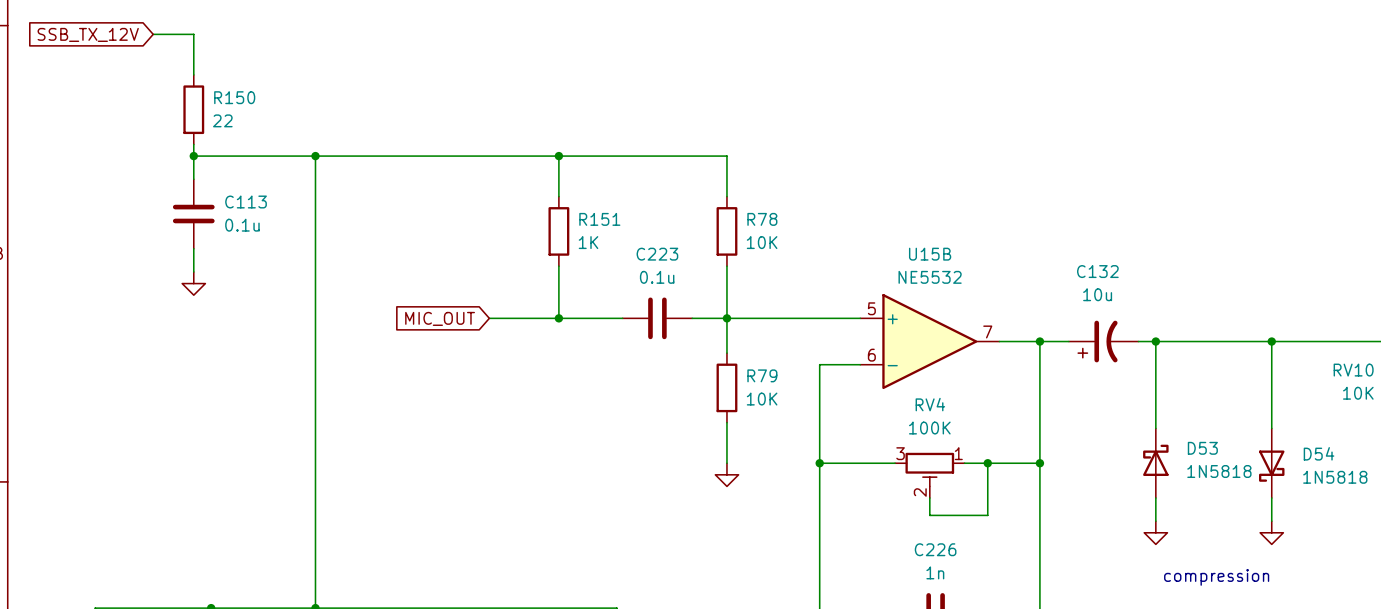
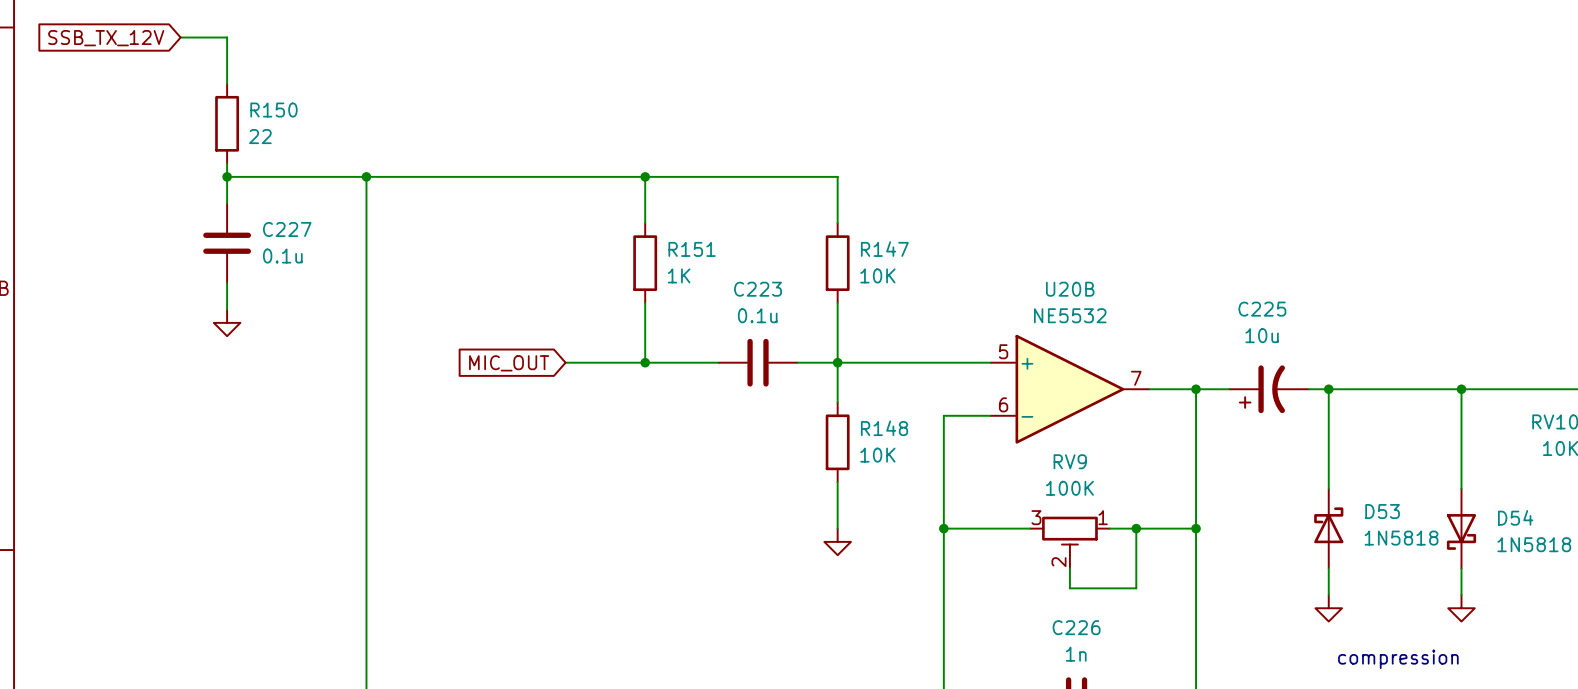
C113 name: C113 (246, 202) -> C227 (287, 229)
R78 name: R78 (762, 219) -> R147 (884, 249)
U15B name: U15B (930, 254) -> U20B (1070, 289)
C132 name: C132 (1097, 271) -> C225 (1262, 309)
R79 name: R79 (762, 375) -> R148 (884, 428)
RV4 name: RV4 (930, 404) -> RV9 (1070, 461)

